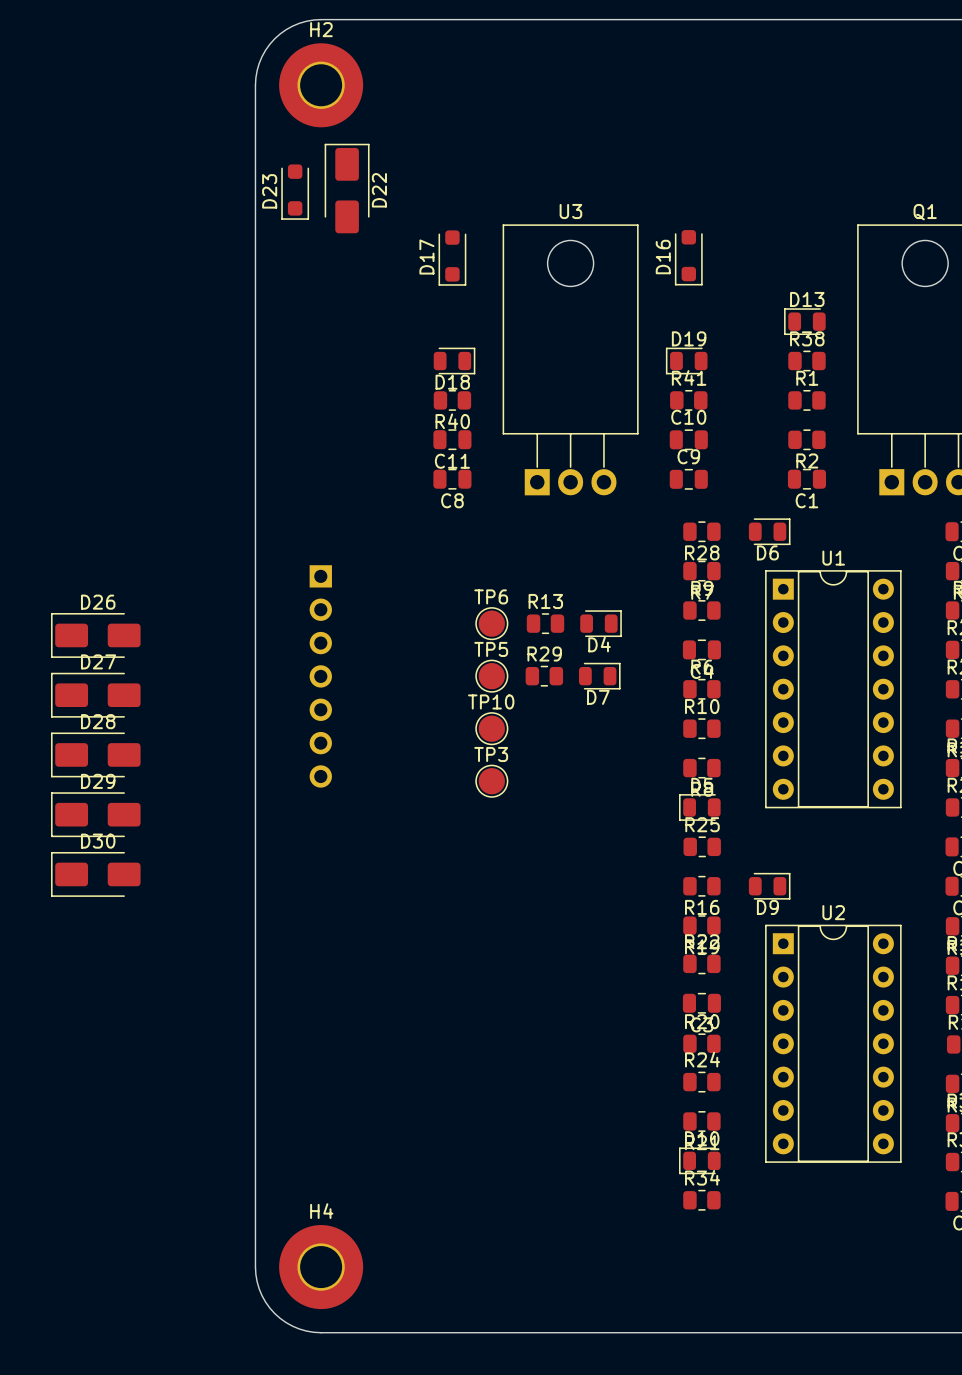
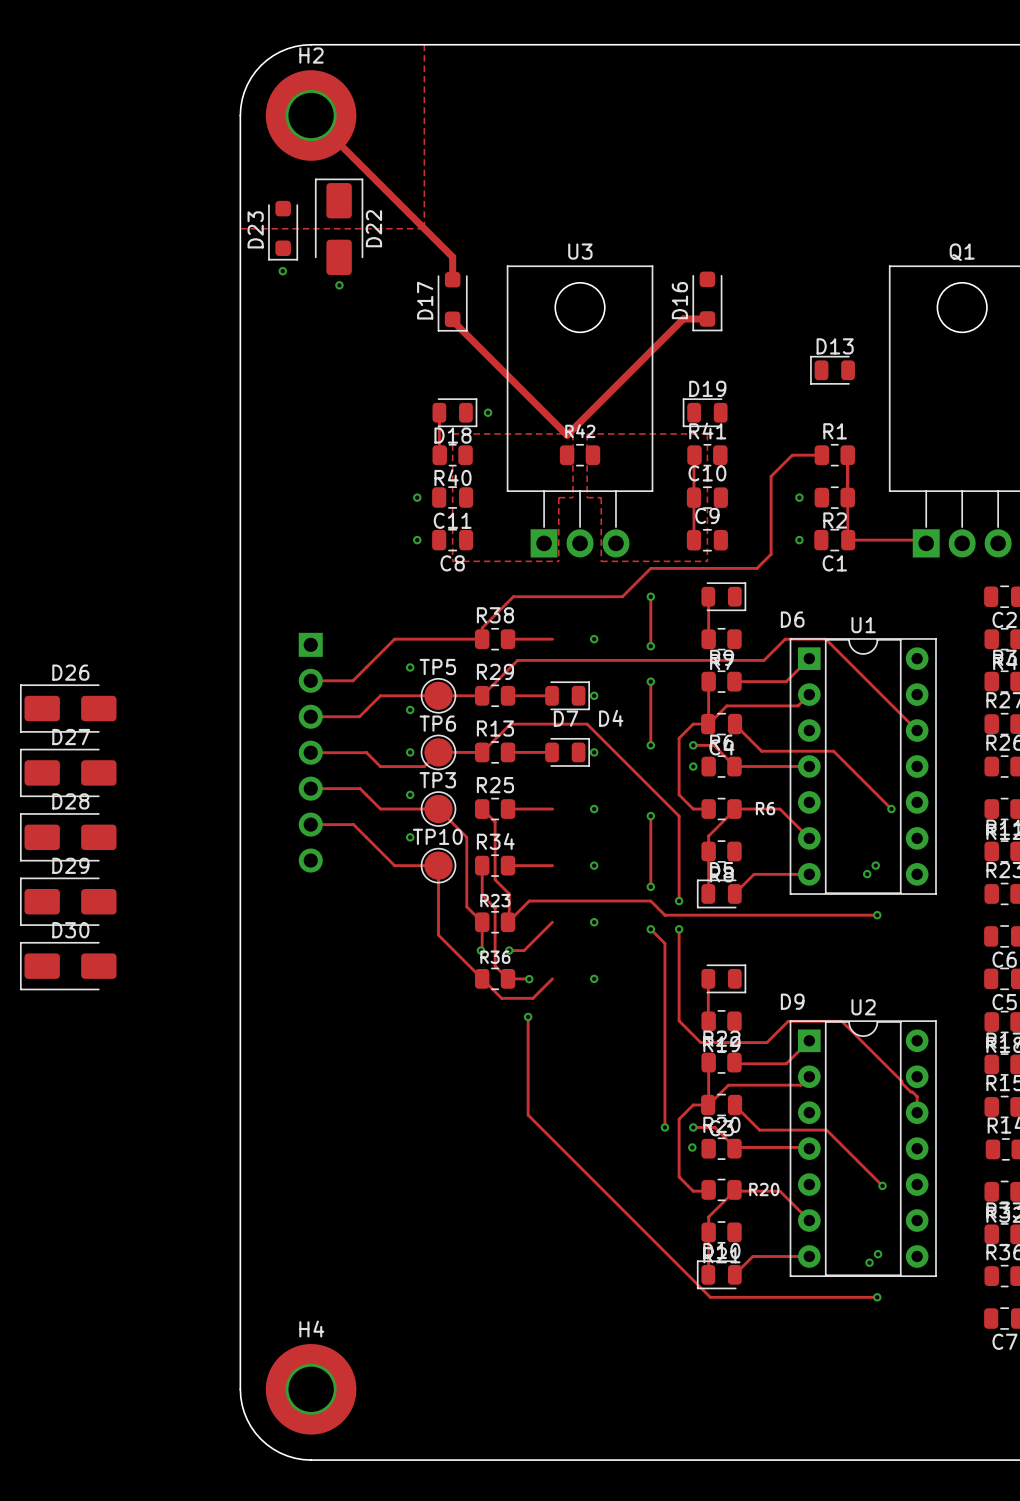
zone outline: none -> (424, 44) (424, 228) (240, 228)
track: none -> (311, 115) (452, 257) (452, 279)
via: none -> (282, 271)
via: none -> (339, 285)
track: none -> (707, 319) (683, 319) (567, 435) (452, 319)
track: none -> (439, 412) (439, 455)
via: none -> (488, 412)
R38 position: (806, 361) -> (495, 639)
zone outline: none -> (452, 433) (572, 433) (572, 497) (558, 497) (558, 561) (452, 561) (452, 433)
zone outline: none -> (587, 433) (707, 433) (707, 561) (601, 561) (601, 497) (587, 497) (587, 433)
R42: none -> (580, 455)
track: none -> (694, 455) (693, 540)
track: none -> (821, 455) (792, 455) (771, 476) (771, 554) (756, 568) (650, 568) (622, 596) (513, 596) (482, 627) (482, 639) (394, 639) (353, 680) (310, 680)
track: none -> (847, 455) (847, 539) (922, 540) (926, 543)
via: none -> (417, 497)
via: none -> (799, 497)
via: none -> (417, 540)
via: none -> (799, 540)
track: none -> (650, 596) (650, 646)
via: none -> (650, 596)
track: none -> (708, 596) (708, 639)
R28: (701, 531) -> none
D6 position: (769, 531) -> (723, 596)
track: none -> (508, 639) (552, 639)
via: none -> (594, 639)
via: none -> (650, 646)
track: none -> (809, 658) (786, 681) (734, 681)
via: none -> (410, 667)
track: none -> (650, 681) (650, 745)
via: none -> (650, 681)
track: none -> (708, 681) (708, 724)
track: none -> (809, 694) (797, 705) (726, 705) (708, 724)
TP6 position: (491, 623) -> (438, 752)
track: none -> (508, 695) (552, 695)
R13 position: (545, 623) -> (495, 752)
via: none -> (594, 695)
D4 position: (601, 623) -> (567, 752)
via: none -> (410, 709)
track: none -> (310, 716) (359, 716) (380, 695) (482, 695) (517, 660) (764, 660) (785, 639) (825, 639) (917, 730)
track: none -> (708, 724) (693, 724) (679, 738) (679, 794) (693, 809) (708, 809)
track: none -> (734, 724) (761, 751) (833, 751) (891, 809)
via: none -> (650, 745)
track: none -> (693, 745) (713, 745) (735, 766)
via: none -> (693, 745)
track: none -> (310, 752) (366, 752) (380, 766) (424, 766) (438, 752) (482, 752) (510, 724) (587, 724) (679, 816) (679, 901)
via: none -> (410, 752)
TP5 position: (491, 676) -> (438, 695)
track: none -> (508, 752) (552, 752)
R29 position: (544, 676) -> (495, 695)
via: none -> (594, 752)
D7 position: (599, 676) -> (567, 695)
via: none -> (693, 766)
track: none -> (735, 766) (809, 766)
R10 name: R10 (702, 706) -> R6 (765, 808)
track: none -> (310, 788) (360, 788) (380, 809) (438, 809) (466, 837) (466, 906) (482, 922) (480, 950)
via: none -> (410, 794)
track: none -> (482, 809) (495, 821) (495, 879) (509, 893) (509, 921)
TP10 position: (491, 728) -> (438, 865)
track: none -> (508, 809) (552, 809)
via: none -> (594, 809)
via: none -> (891, 809)
track: none -> (650, 816) (650, 886)
via: none -> (650, 816)
track: none -> (310, 824) (353, 824) (394, 865) (438, 865) (438, 935) (501, 998) (532, 998) (552, 978)
via: none -> (410, 837)
track: none -> (809, 838) (779, 809) (734, 809) (708, 836) (708, 893)
track: none -> (482, 865) (482, 895) (495, 908) (495, 965) (508, 978) (529, 979)
TP3 position: (491, 781) -> (438, 809)
track: none -> (508, 865) (552, 865)
via: none -> (594, 865)
via: none -> (875, 865)
track: none -> (809, 874) (754, 874) (734, 893)
via: none -> (867, 874)
via: none -> (650, 886)
via: none -> (679, 901)
track: none -> (877, 915) (664, 915) (650, 901) (529, 901) (508, 922)
via: none -> (877, 915)
R23: none -> (495, 922)
track: none -> (552, 922) (524, 950) (509, 950)
via: none -> (594, 922)
track: none -> (650, 929) (664, 943) (664, 1127)
via: none -> (650, 929)
track: none -> (679, 929) (679, 1020) (700, 1042) (766, 1042) (788, 1021) (841, 1021) (917, 1096) (917, 1112)
via: none -> (679, 929)
R25 position: (702, 846) -> (495, 809)
via: none -> (480, 950)
via: none -> (509, 950)
R36: none -> (495, 978)
via: none -> (529, 979)
via: none -> (594, 978)
track: none -> (708, 978) (708, 1021)
R16: (701, 886) -> none
D9 position: (769, 886) -> (723, 978)
track: none -> (528, 1016) (528, 1115) (710, 1297) (877, 1297)
via: none -> (528, 1016)
track: none -> (809, 1040) (786, 1063) (734, 1063)
track: none -> (708, 1063) (708, 1105)
track: none -> (809, 1076) (800, 1085) (728, 1085) (708, 1105)
track: none -> (708, 1105) (693, 1105) (679, 1119) (679, 1177) (693, 1191) (708, 1191)
track: none -> (734, 1105) (759, 1130) (826, 1130) (882, 1185)
via: none -> (664, 1127)
track: none -> (693, 1127) (715, 1127) (735, 1147) (809, 1148)
via: none -> (693, 1127)
via: none -> (692, 1147)
R24 name: R24 (702, 1059) -> R20 (764, 1189)
via: none -> (882, 1185)
track: none -> (809, 1220) (779, 1191) (734, 1191) (708, 1216) (708, 1274)
via: none -> (878, 1254)
track: none -> (809, 1256) (752, 1256) (734, 1274)
via: none -> (869, 1262)
via: none -> (877, 1297)
R34 position: (701, 1200) -> (495, 865)

